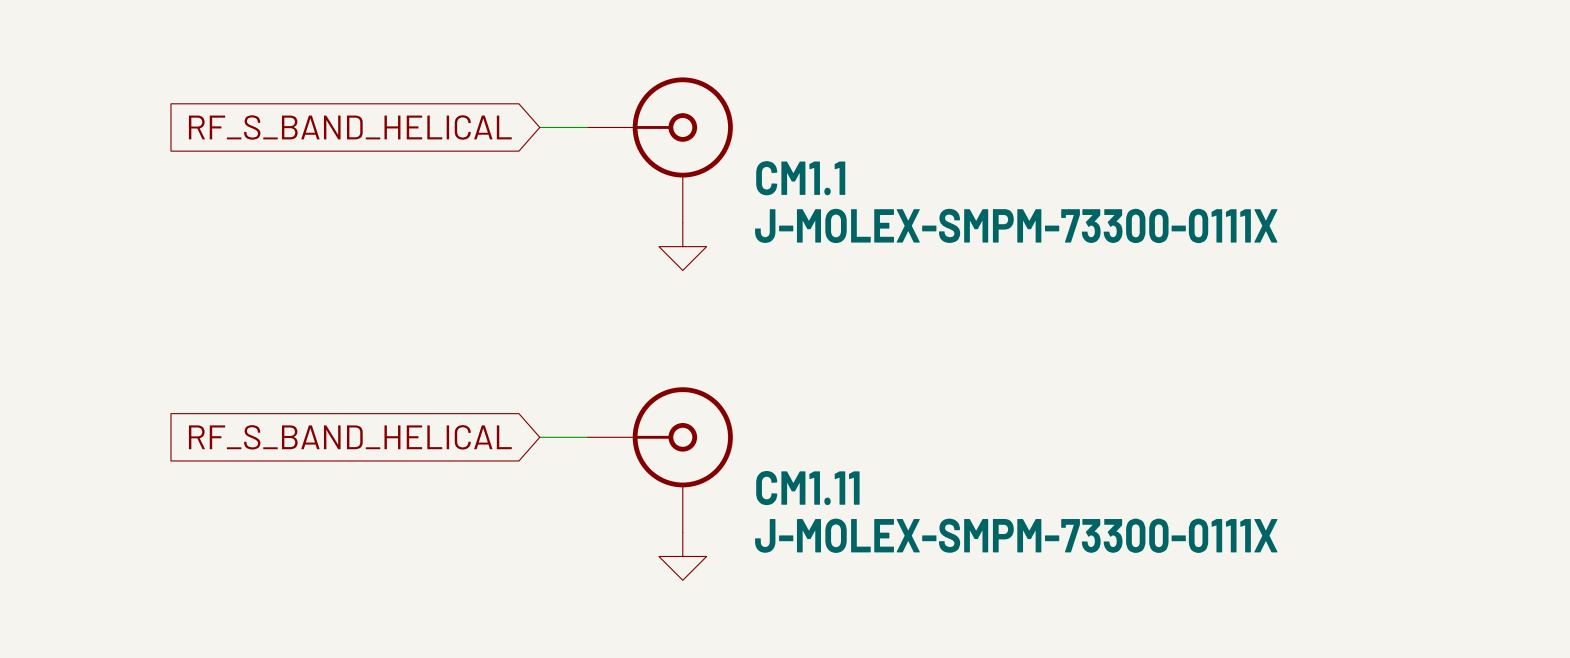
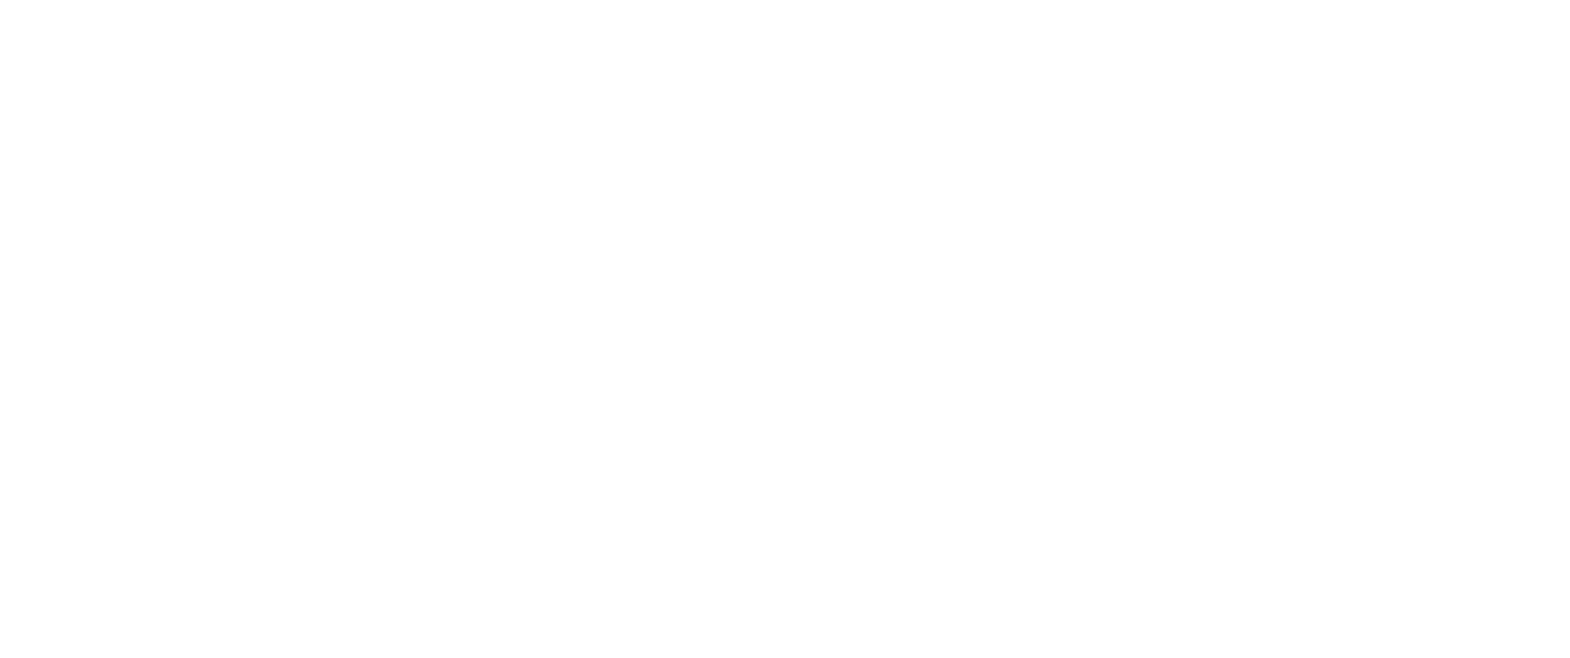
global label: RF_S_BAND_HELICAL (350, 127) -> none
wire: (539, 127) (587, 127) -> none
CM1.1: J-MOLEX-SMPM-73300-0111X (660, 150) -> none
power symbol: (682, 246) -> none
global label: RF_S_BAND_HELICAL (350, 437) -> none
wire: (539, 437) (587, 437) -> none
CM1.11: J-MOLEX-SMPM-73300-0111X (660, 459) -> none
power symbol: (682, 556) -> none

